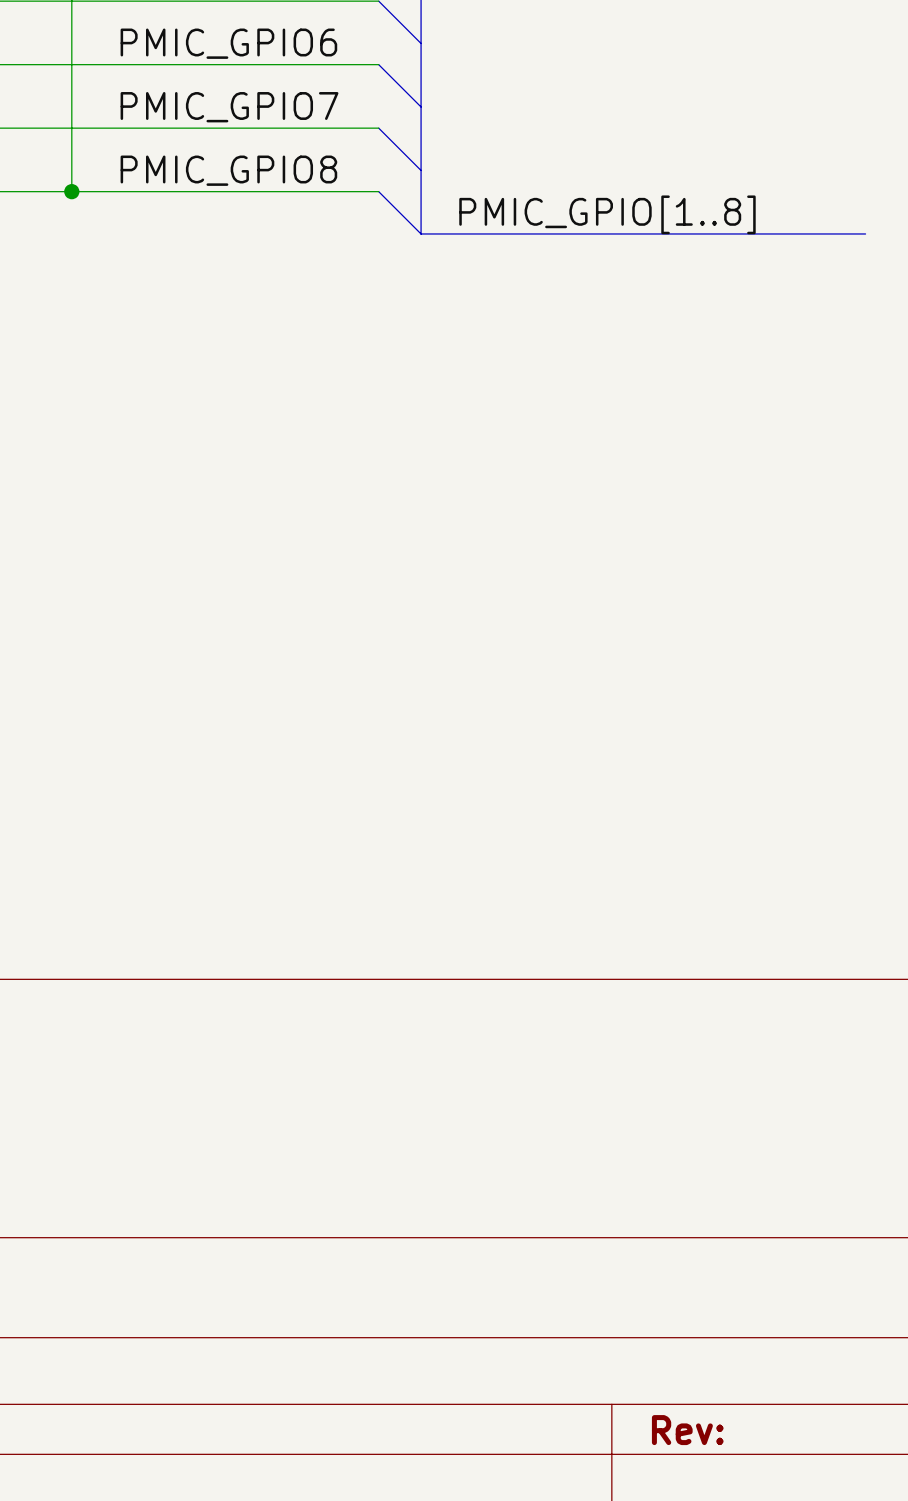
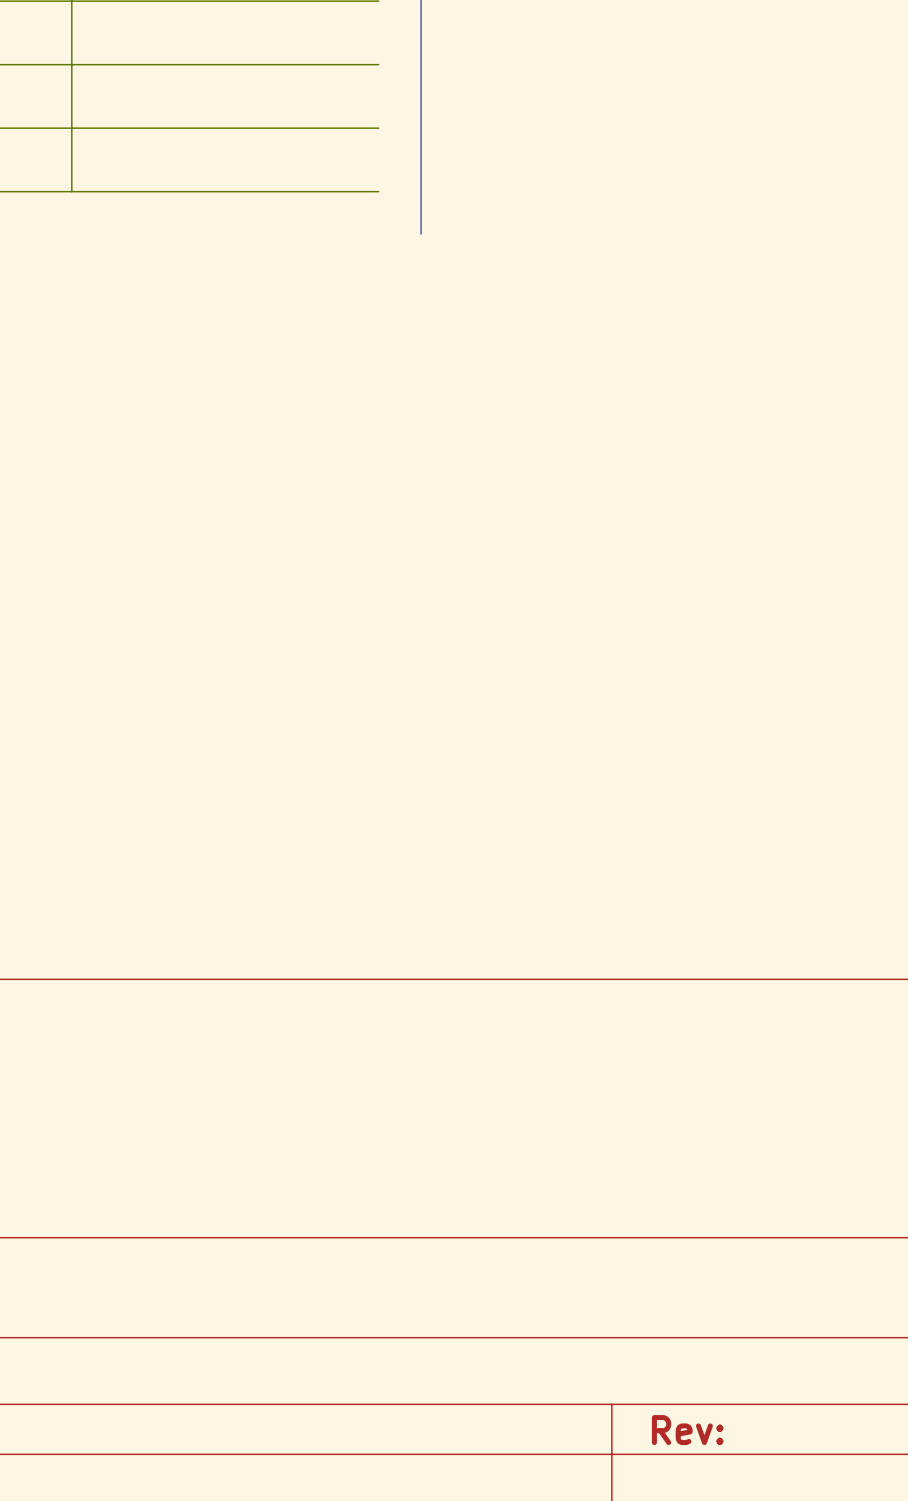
bus: (378, 1) (421, 43) -> none
label: PMIC_GPIO6 (228, 43) -> none
bus: (378, 64) (421, 106) -> none
label: PMIC_GPIO7 (229, 107) -> none
bus: (378, 128) (421, 170) -> none
label: PMIC_GPIO8 (228, 170) -> none
junction: (71, 191) -> none
bus: (378, 191) (421, 233) (865, 233) -> none
label: PMIC_GPIO[1..8] (607, 214) -> none

